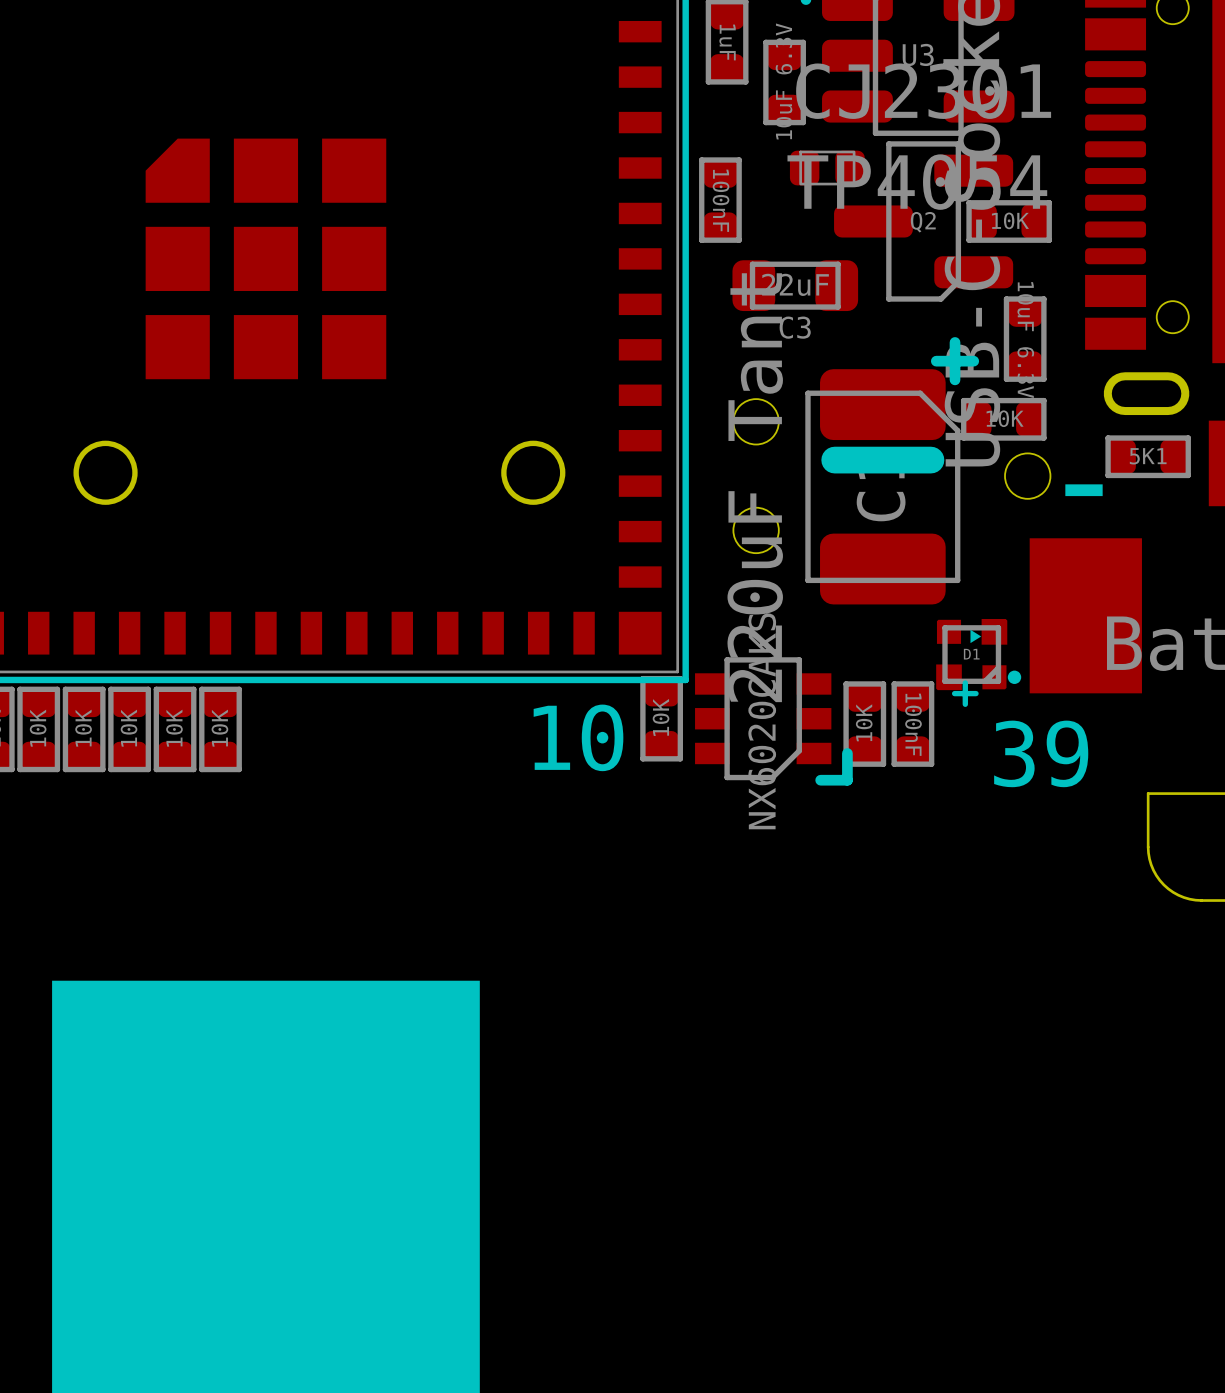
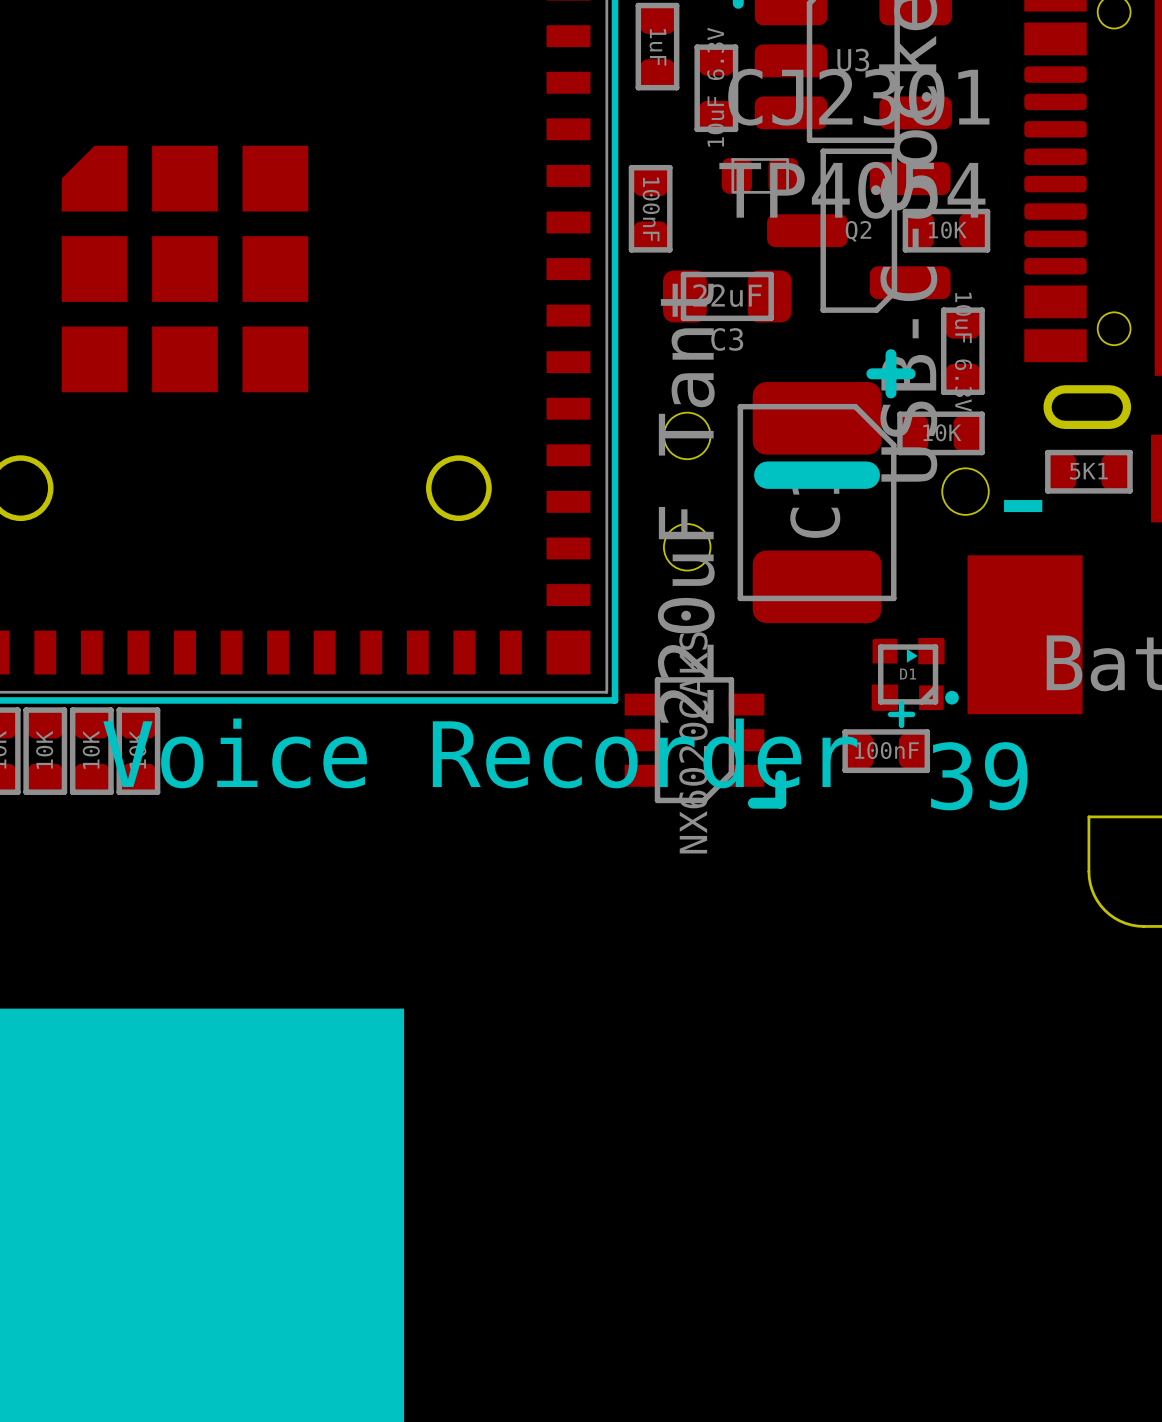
part: 10K (661, 718) -> none
part: 10K (864, 724) -> none
part rotation: 0° (912, 724) -> 90° clockwise (886, 751)
text: 10 (578, 737) -> Voice Recorder (480, 753)

